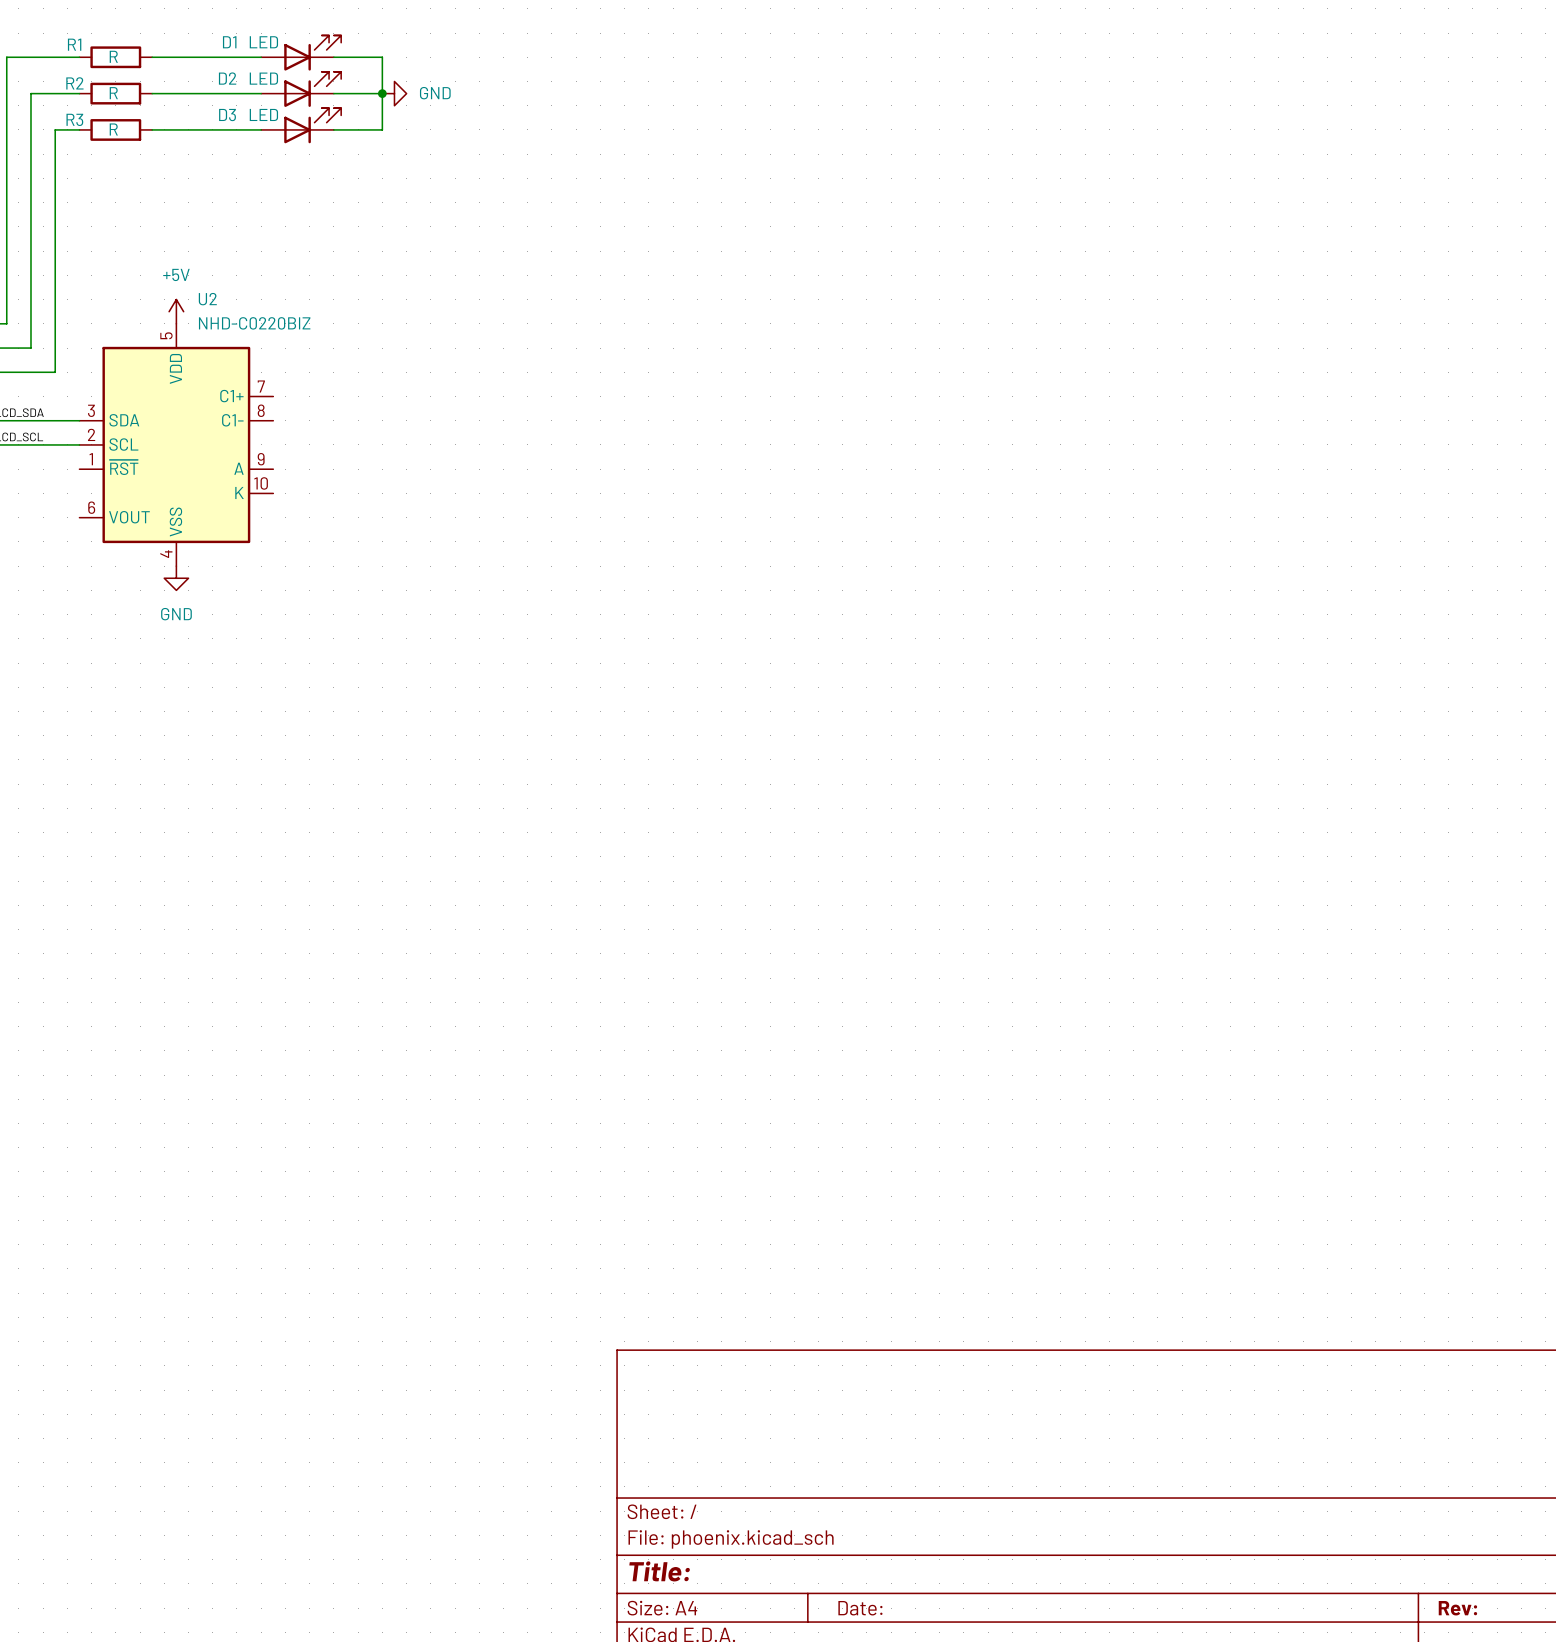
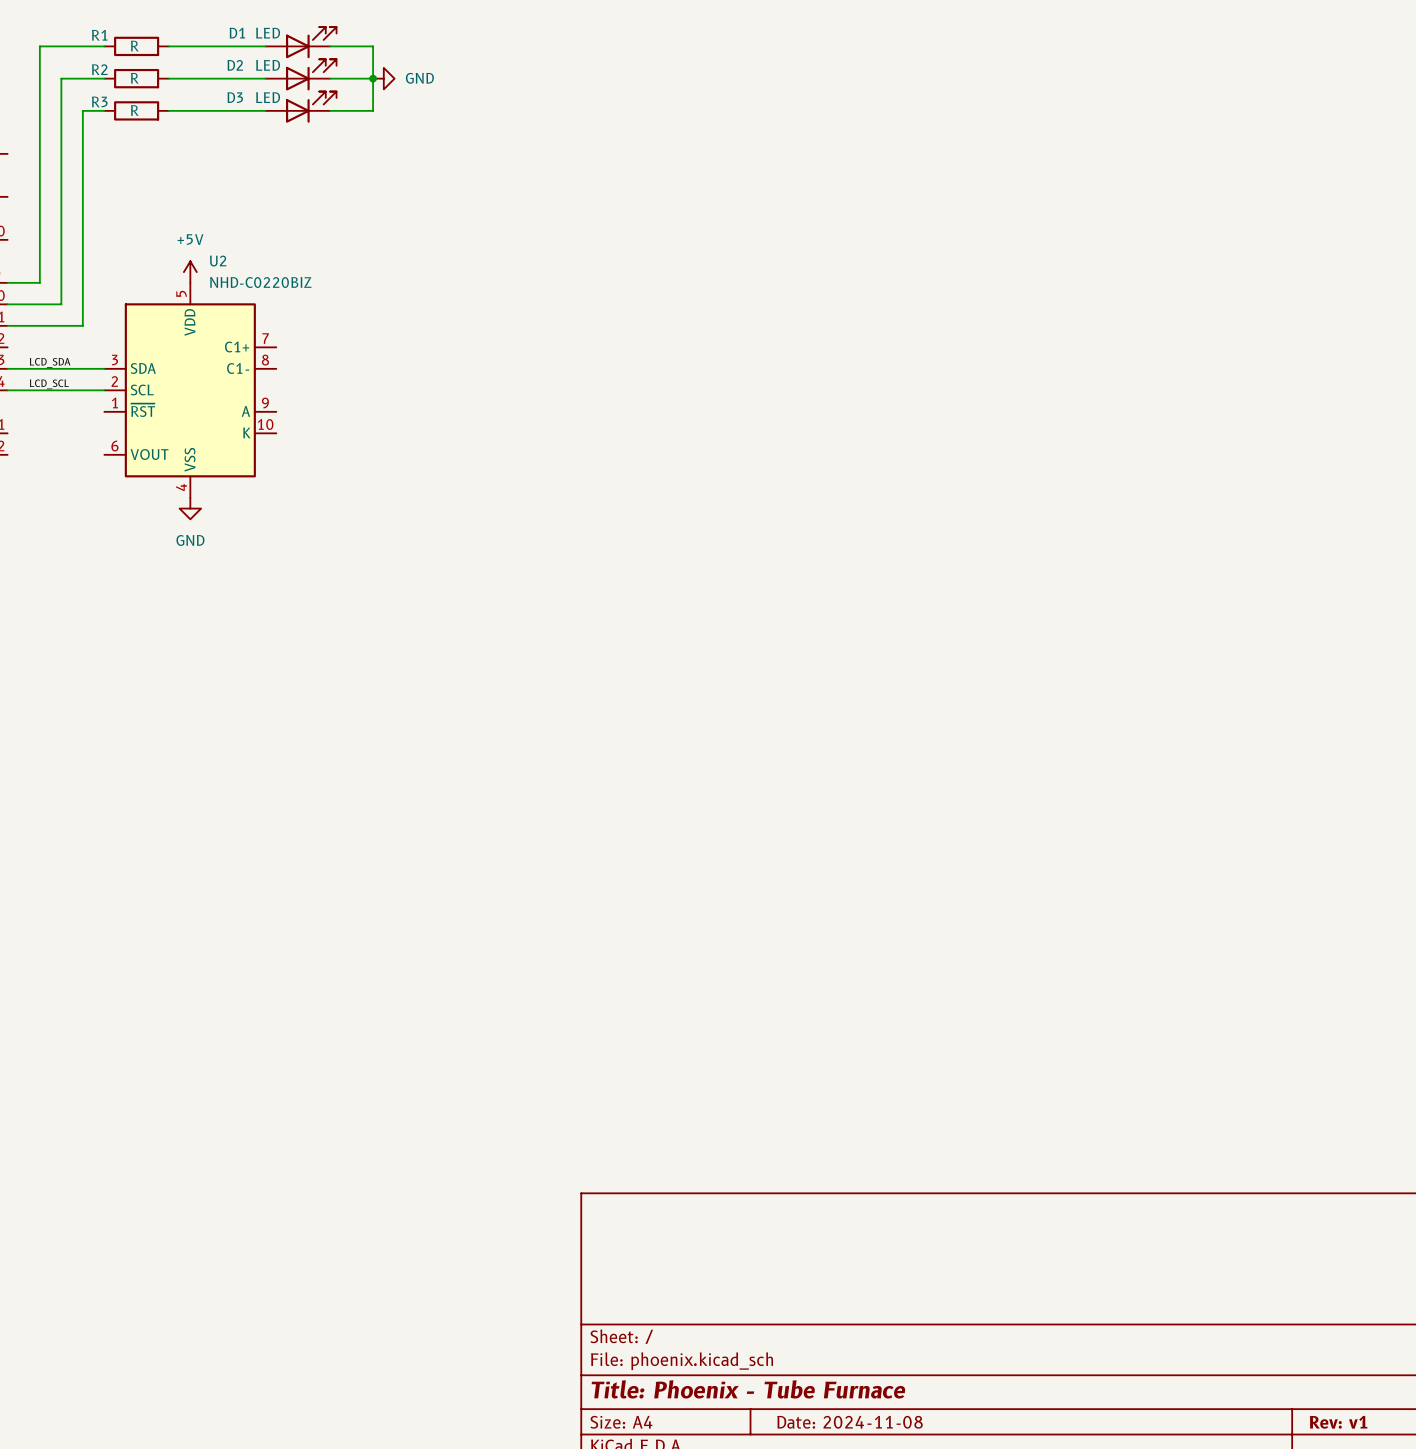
title block: Title: (659, 1571) -> Title: Phoenix - Tube Furnace (748, 1389)
title block: Date: (860, 1608) -> Date: 2024-11-08 (850, 1422)
title block: Rev: (1457, 1608) -> Rev: v1 (1338, 1422)

